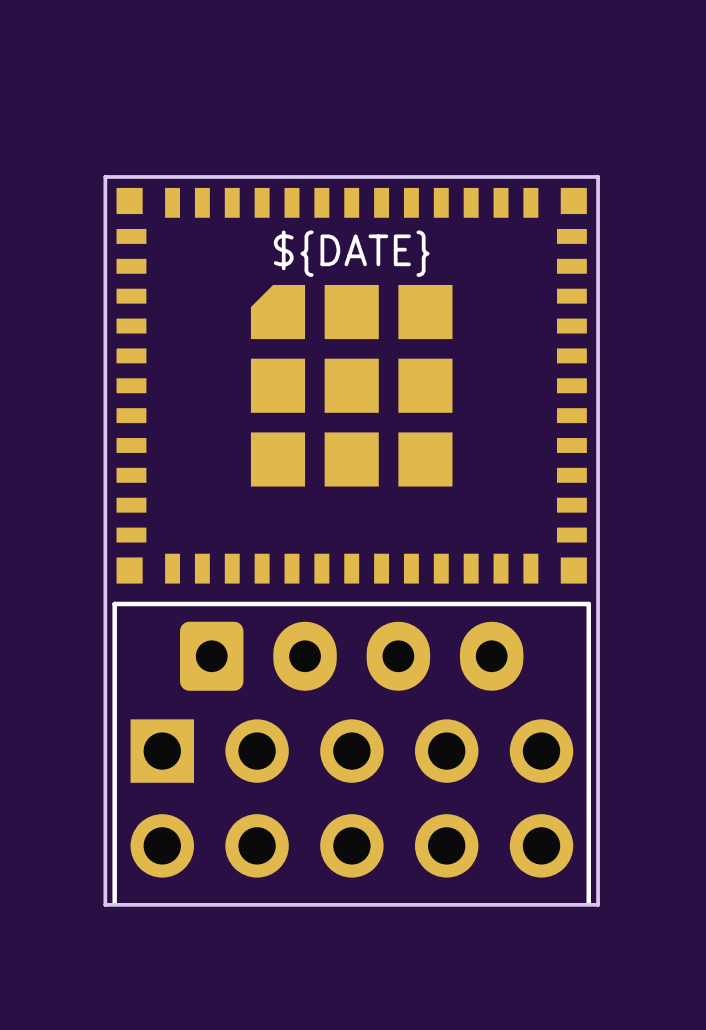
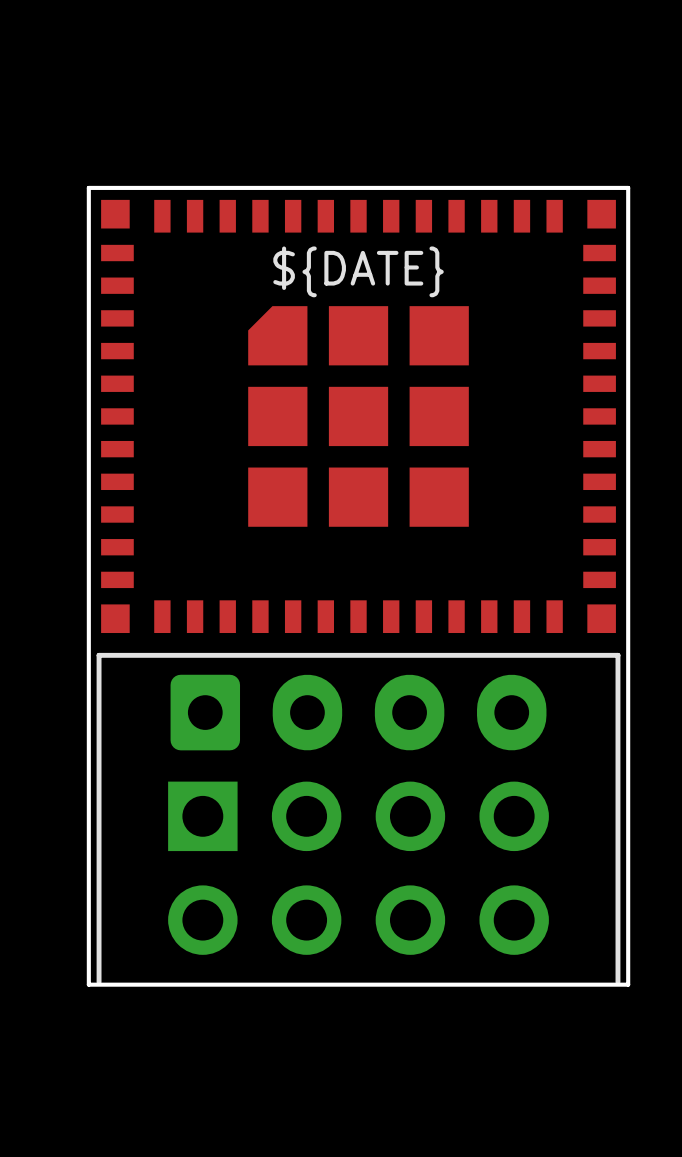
part footprint: [130, 719, 574, 878] -> [168, 781, 549, 955]

